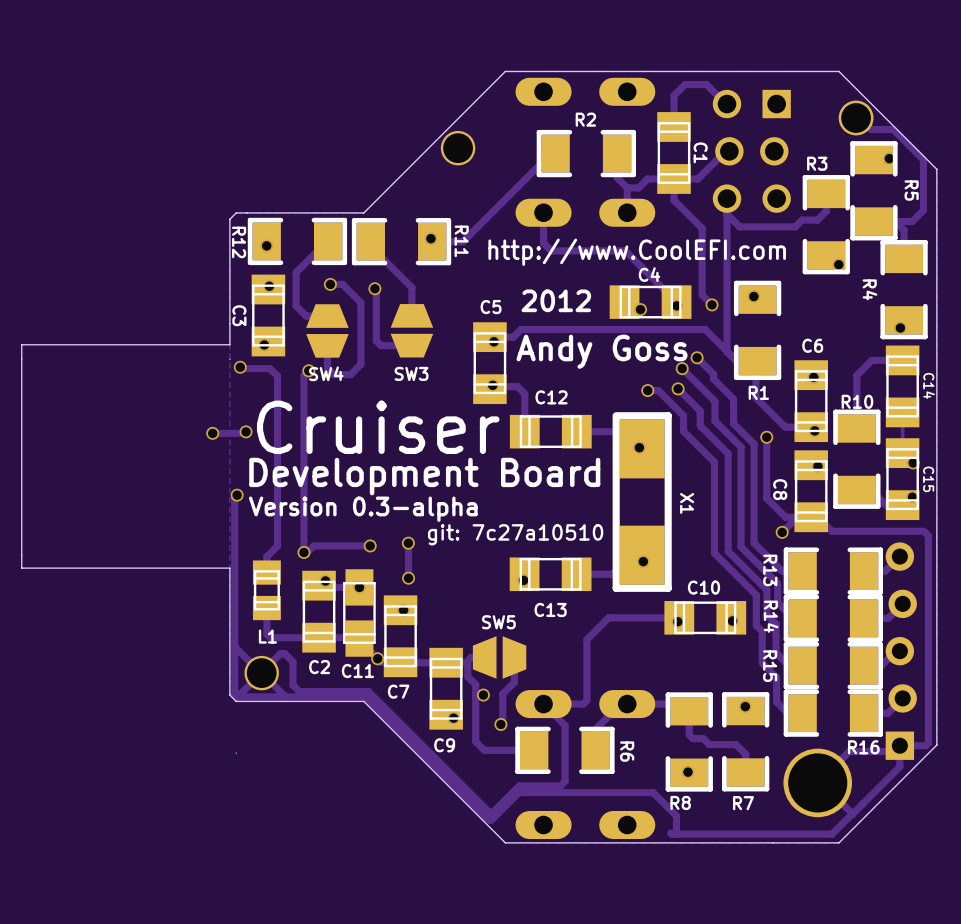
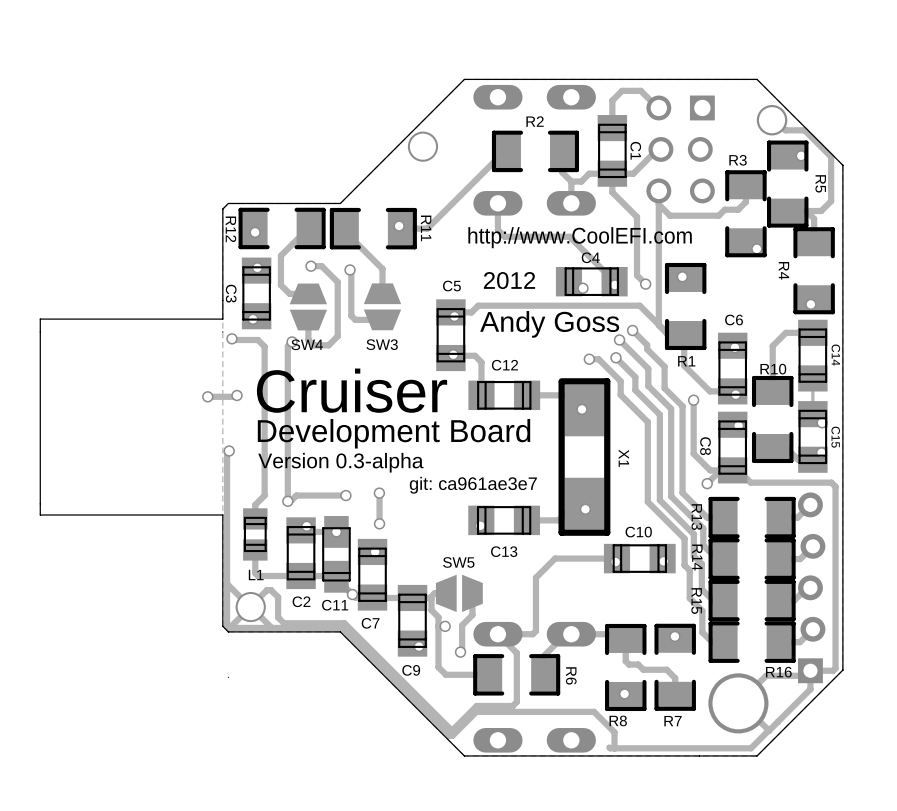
text: git: 7c27a10510 (515, 534) -> git: ca961ae3e7 (473, 485)

